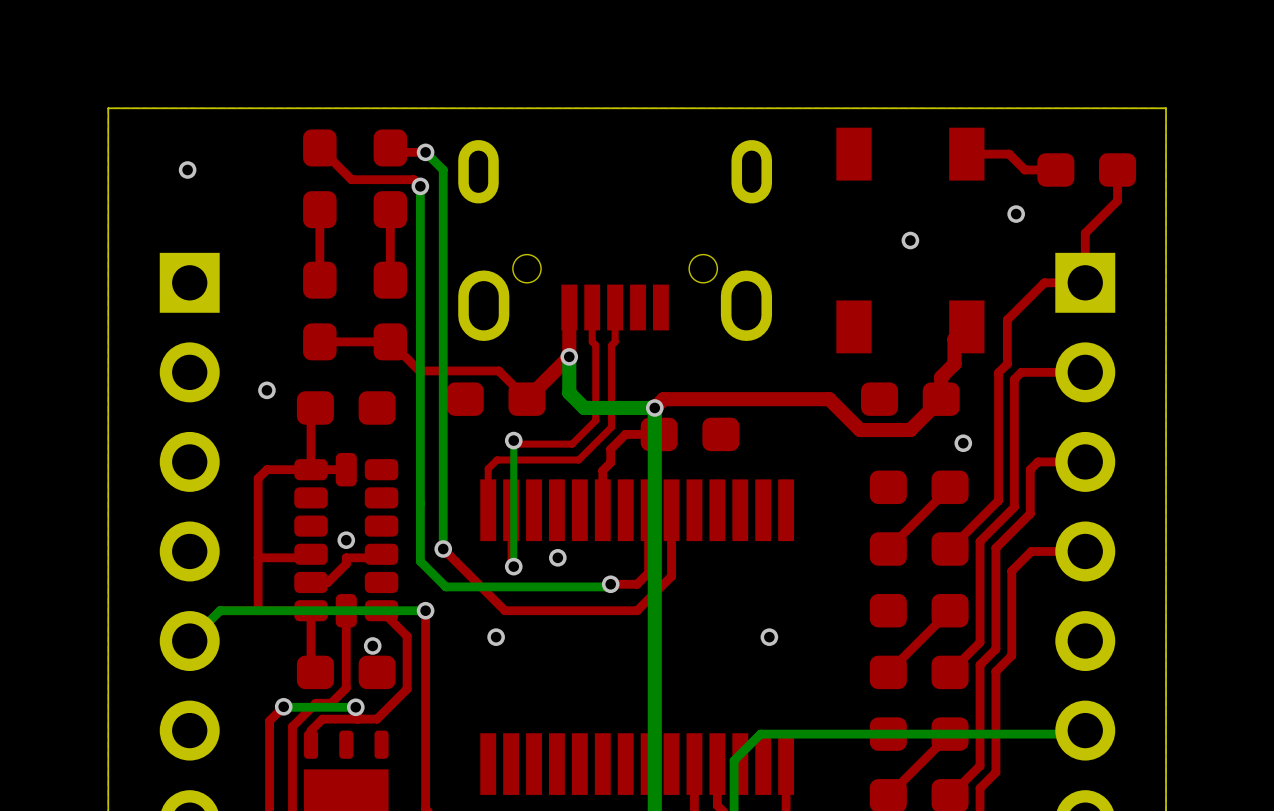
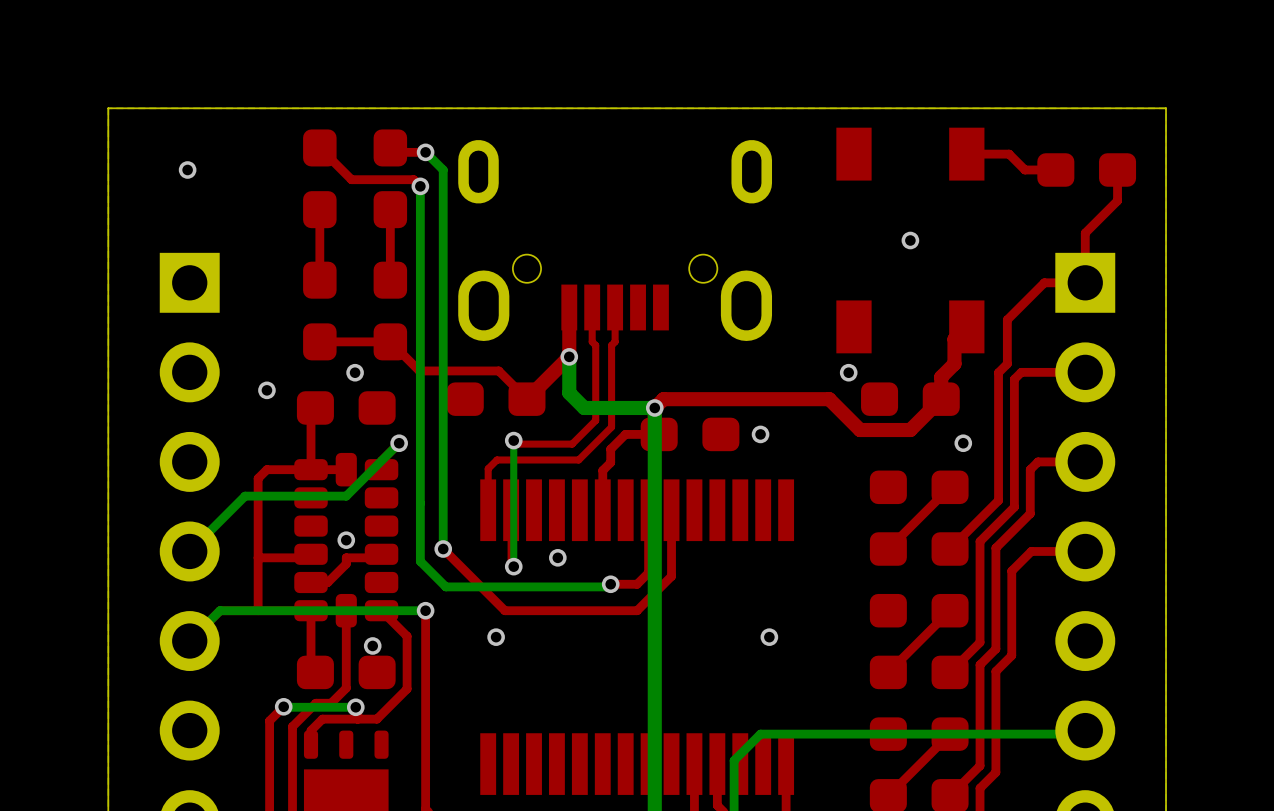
via: (1016, 214) -> none
via: none -> (355, 372)
via: none -> (848, 372)
via: none -> (760, 434)
bottom track: none -> (399, 443) (346, 496) (245, 496) (189, 551)
via: none -> (399, 443)

